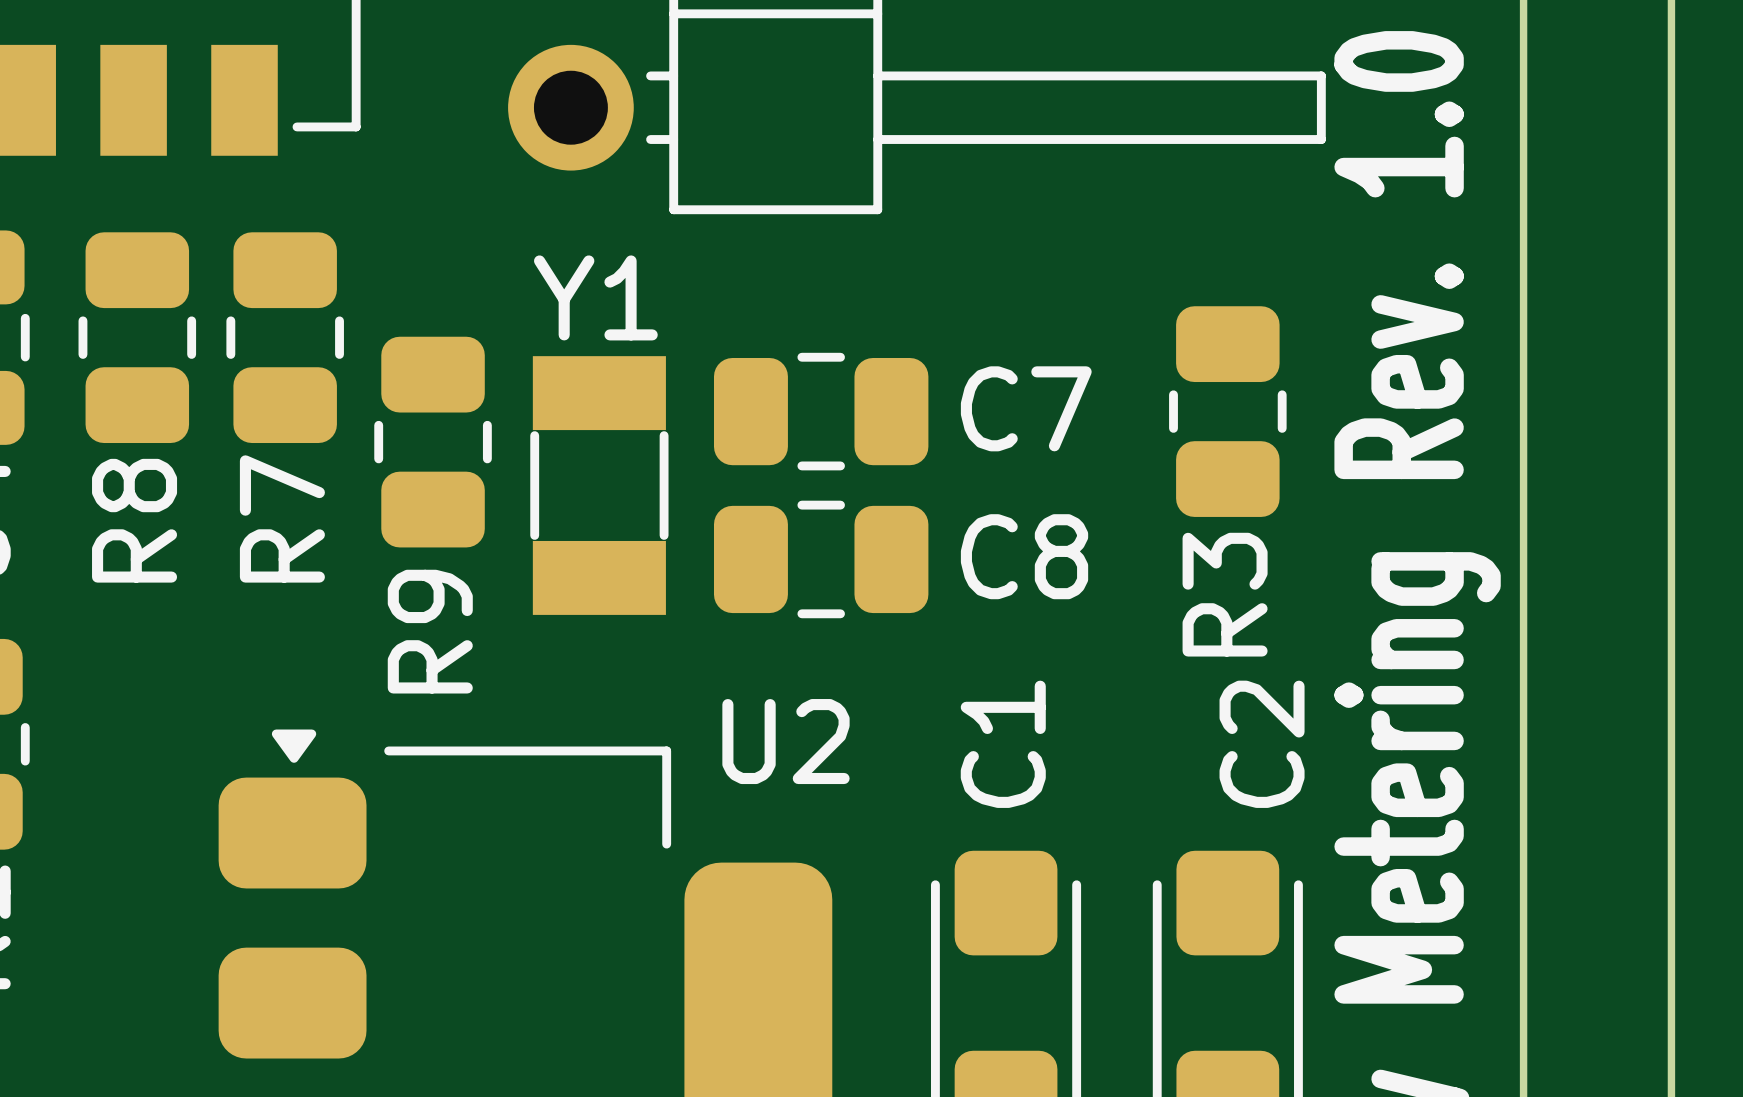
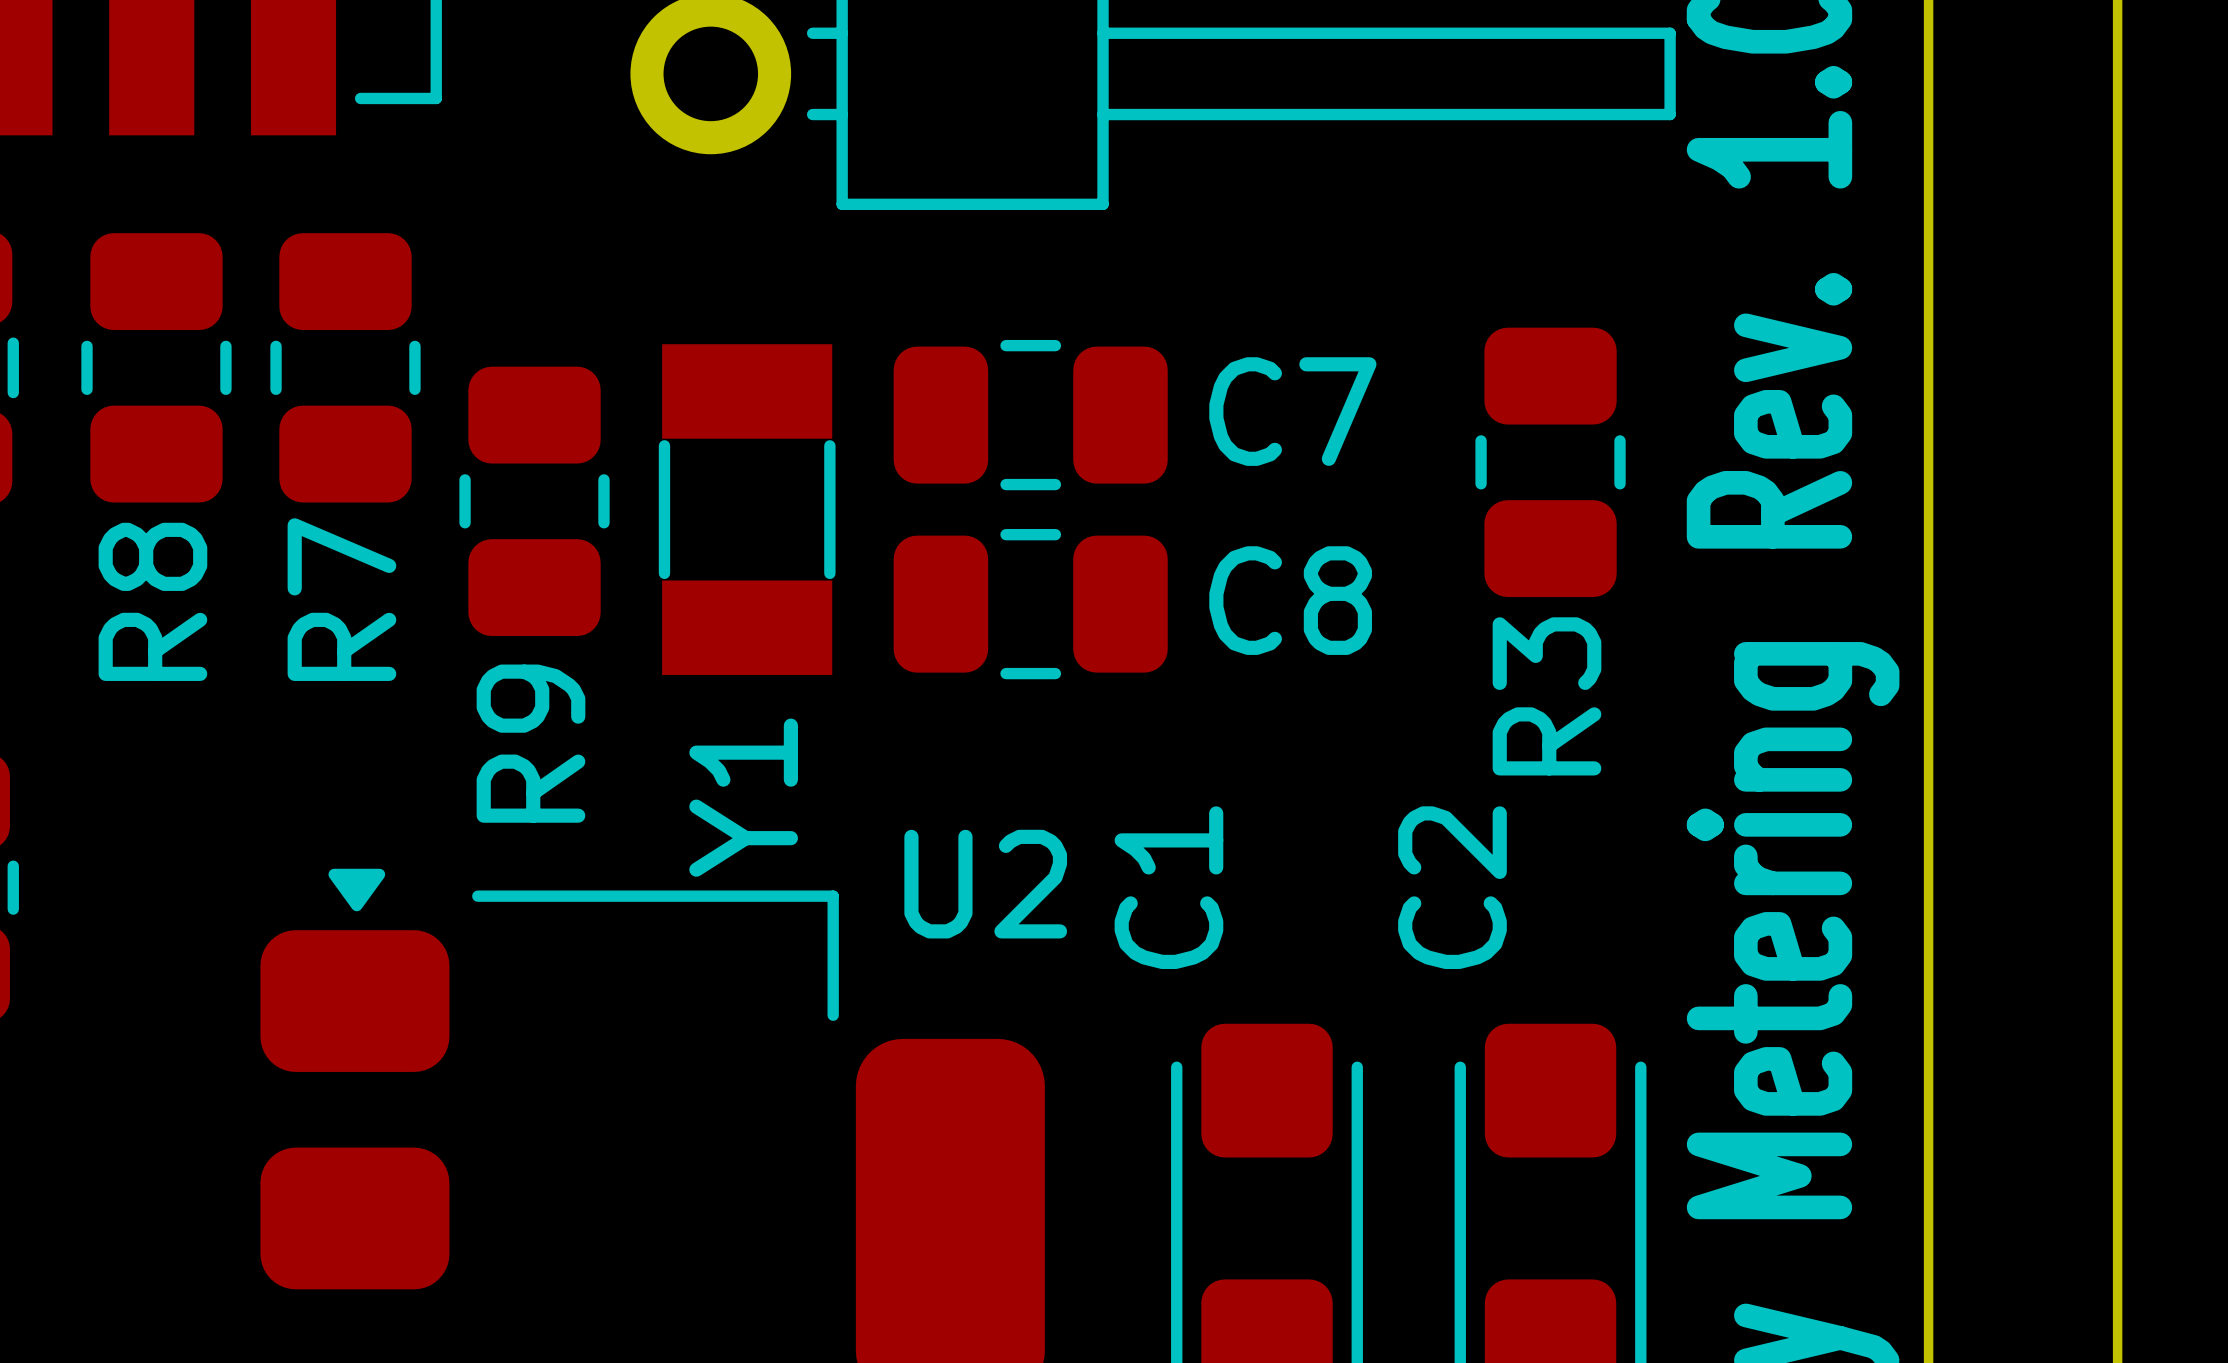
Y1 name rotation: 0° (595, 297) -> 90° counterclockwise (743, 797)
Y1 name position: Y1 (595, 297) -> Y1 (743, 797)
C7 position: (821, 411) -> (1030, 415)
Y1 position: (599, 485) -> (747, 509)
C8 position: (821, 559) -> (1030, 604)
C1 name position: C1 (1003, 744) -> C1 (1168, 887)
C2 name position: C2 (1262, 744) -> C2 (1452, 887)

